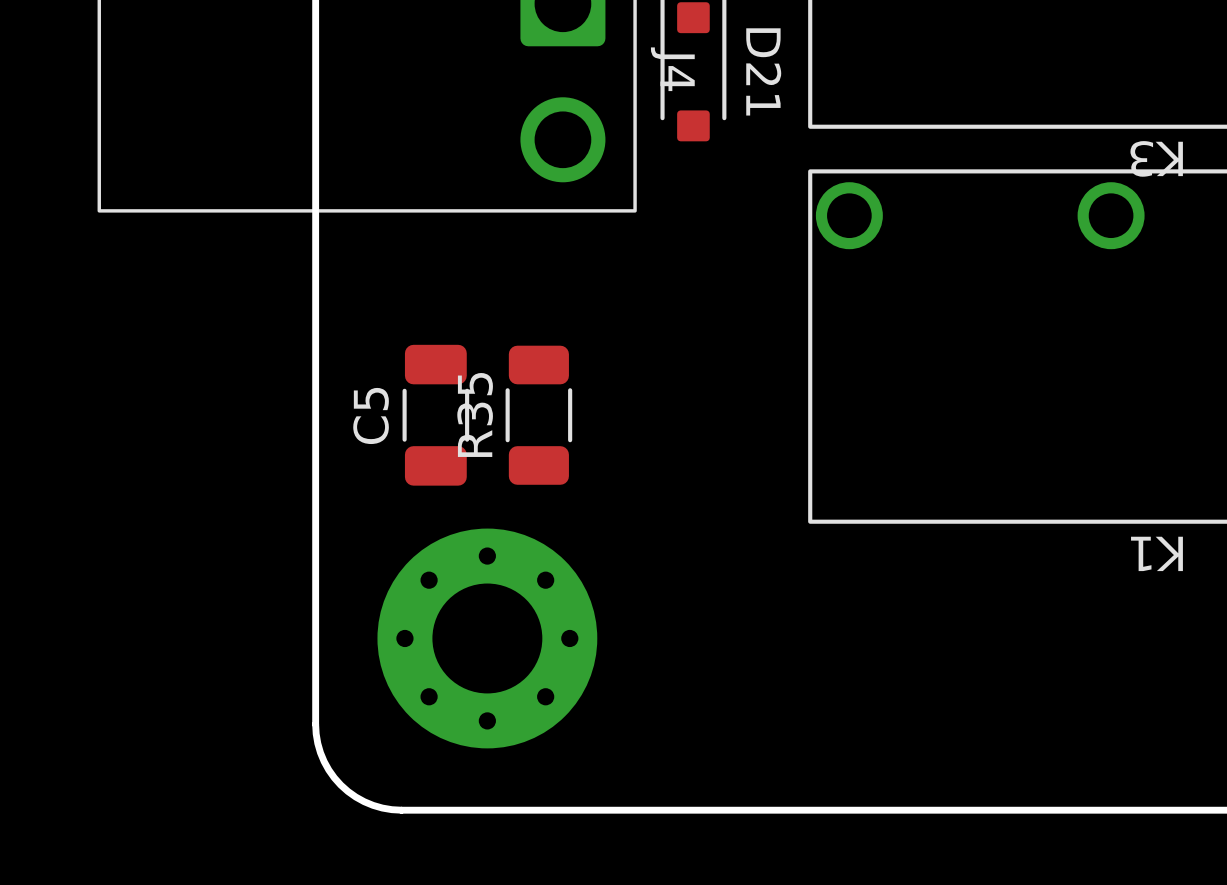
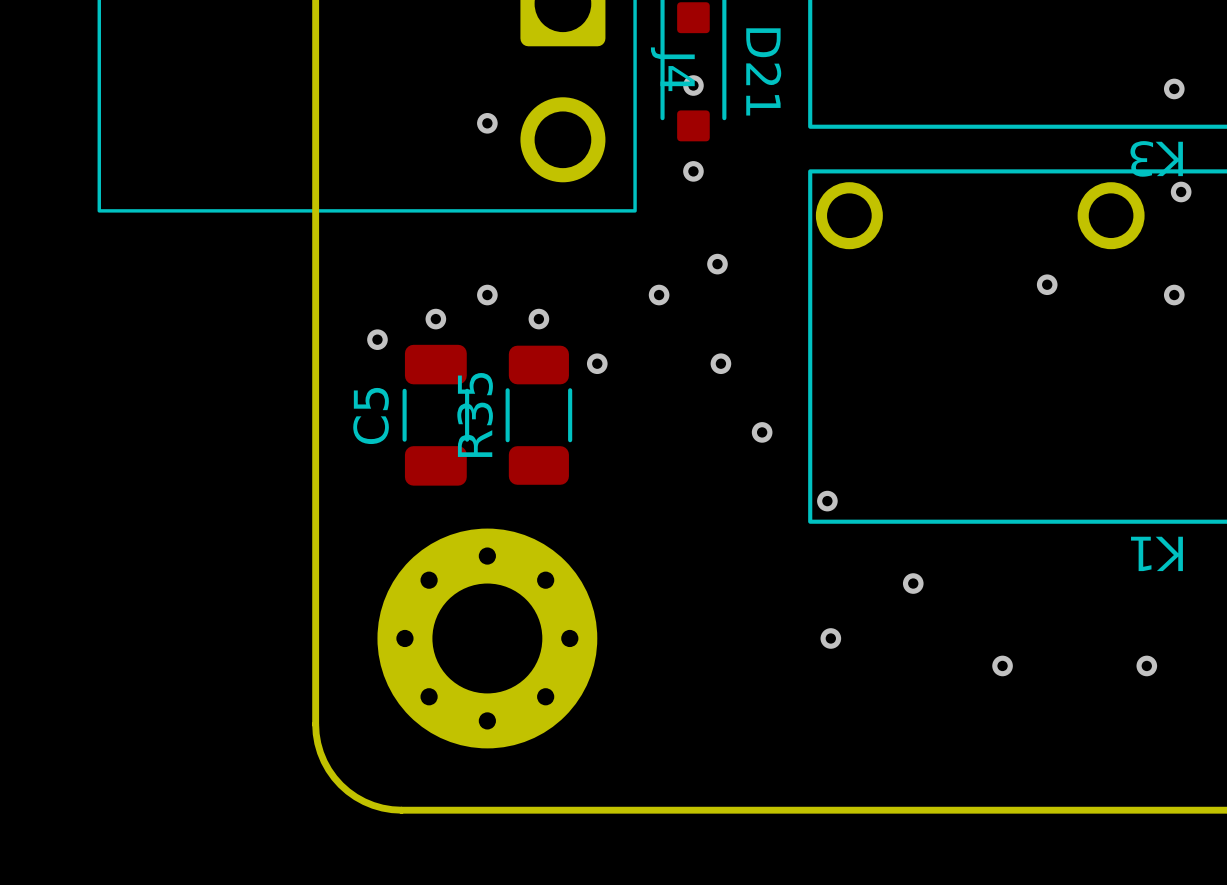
via: none -> (693, 85)
via: none -> (1174, 88)
via: none -> (487, 123)
via: none -> (693, 171)
via: none -> (1181, 191)
via: none -> (717, 264)
via: none -> (1047, 284)
via: none -> (487, 295)
via: none -> (659, 295)
via: none -> (1174, 295)
via: none -> (435, 319)
via: none -> (538, 319)
via: none -> (377, 339)
via: none -> (597, 363)
via: none -> (720, 363)
via: none -> (762, 432)
via: none -> (827, 501)
via: none -> (913, 583)
via: none -> (830, 638)
via: none -> (1002, 665)
via: none -> (1146, 665)

